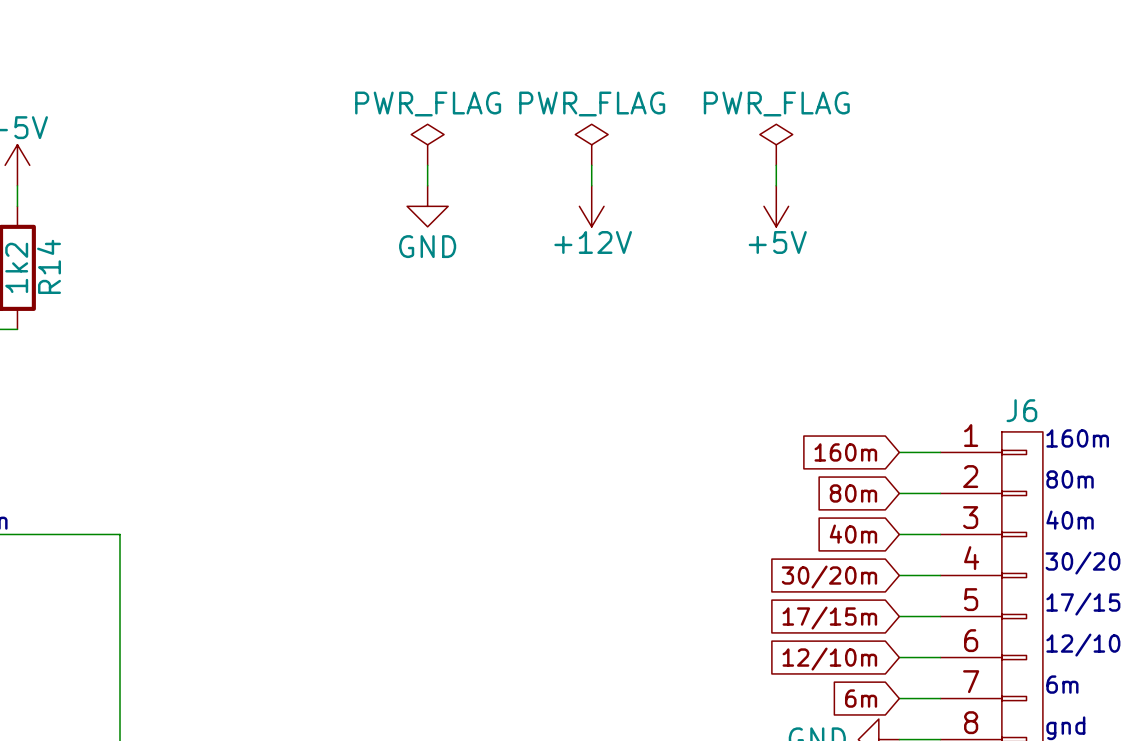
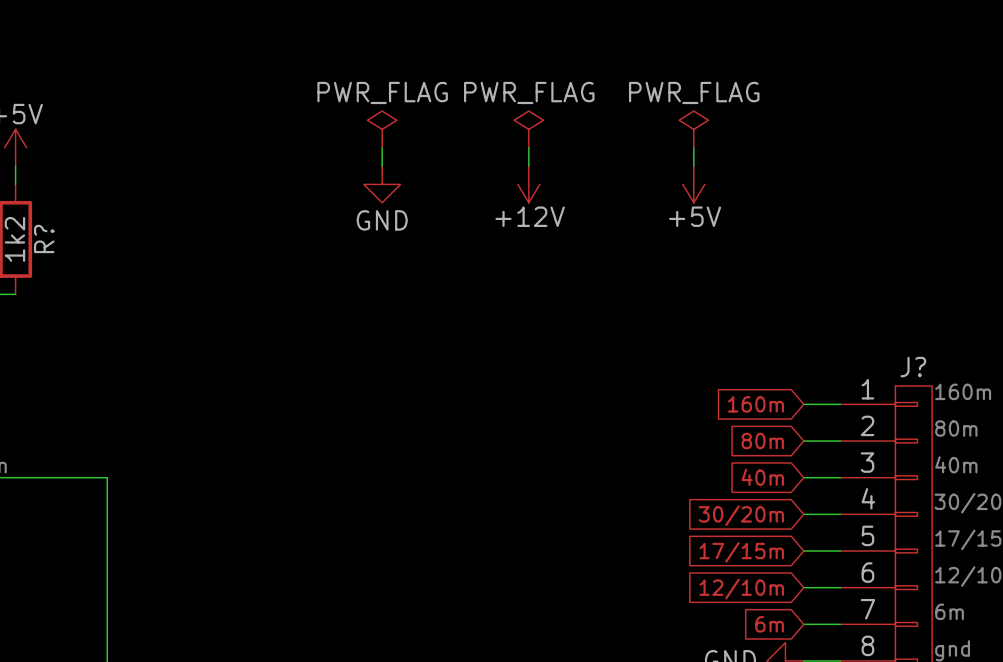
R14 name: R14 (49, 266) -> R? (44, 238)
J6 name: J6 (1021, 410) -> J? (913, 367)

